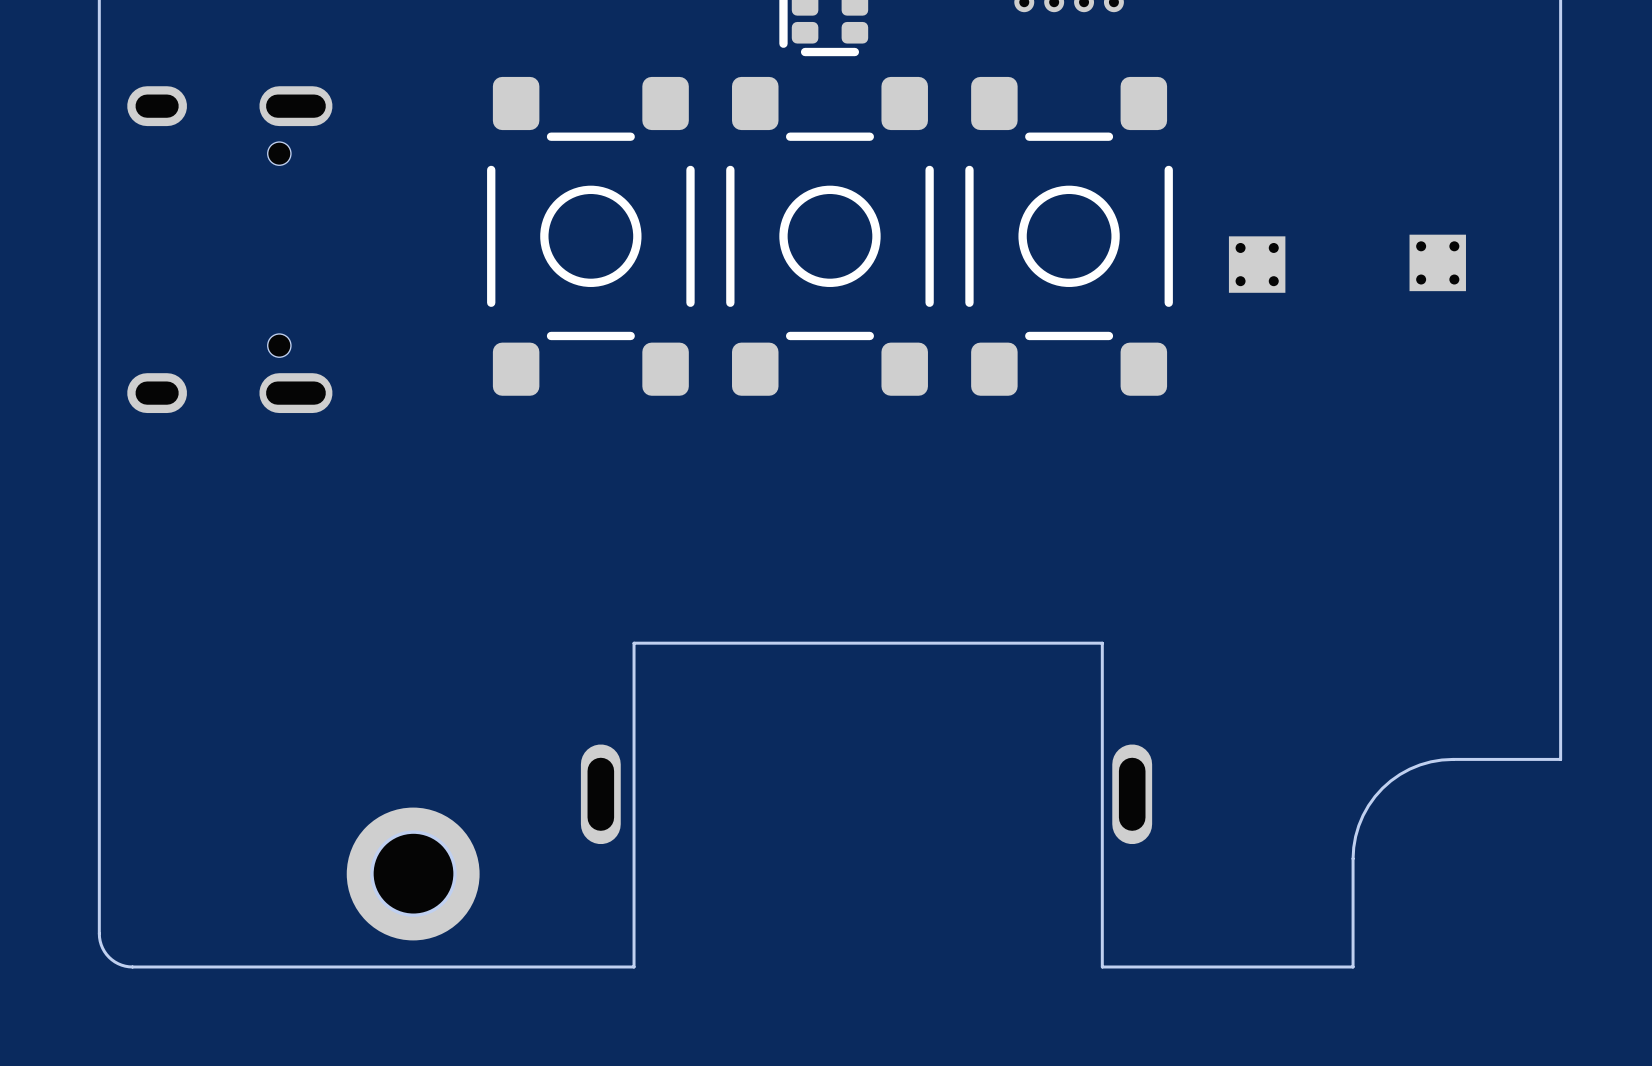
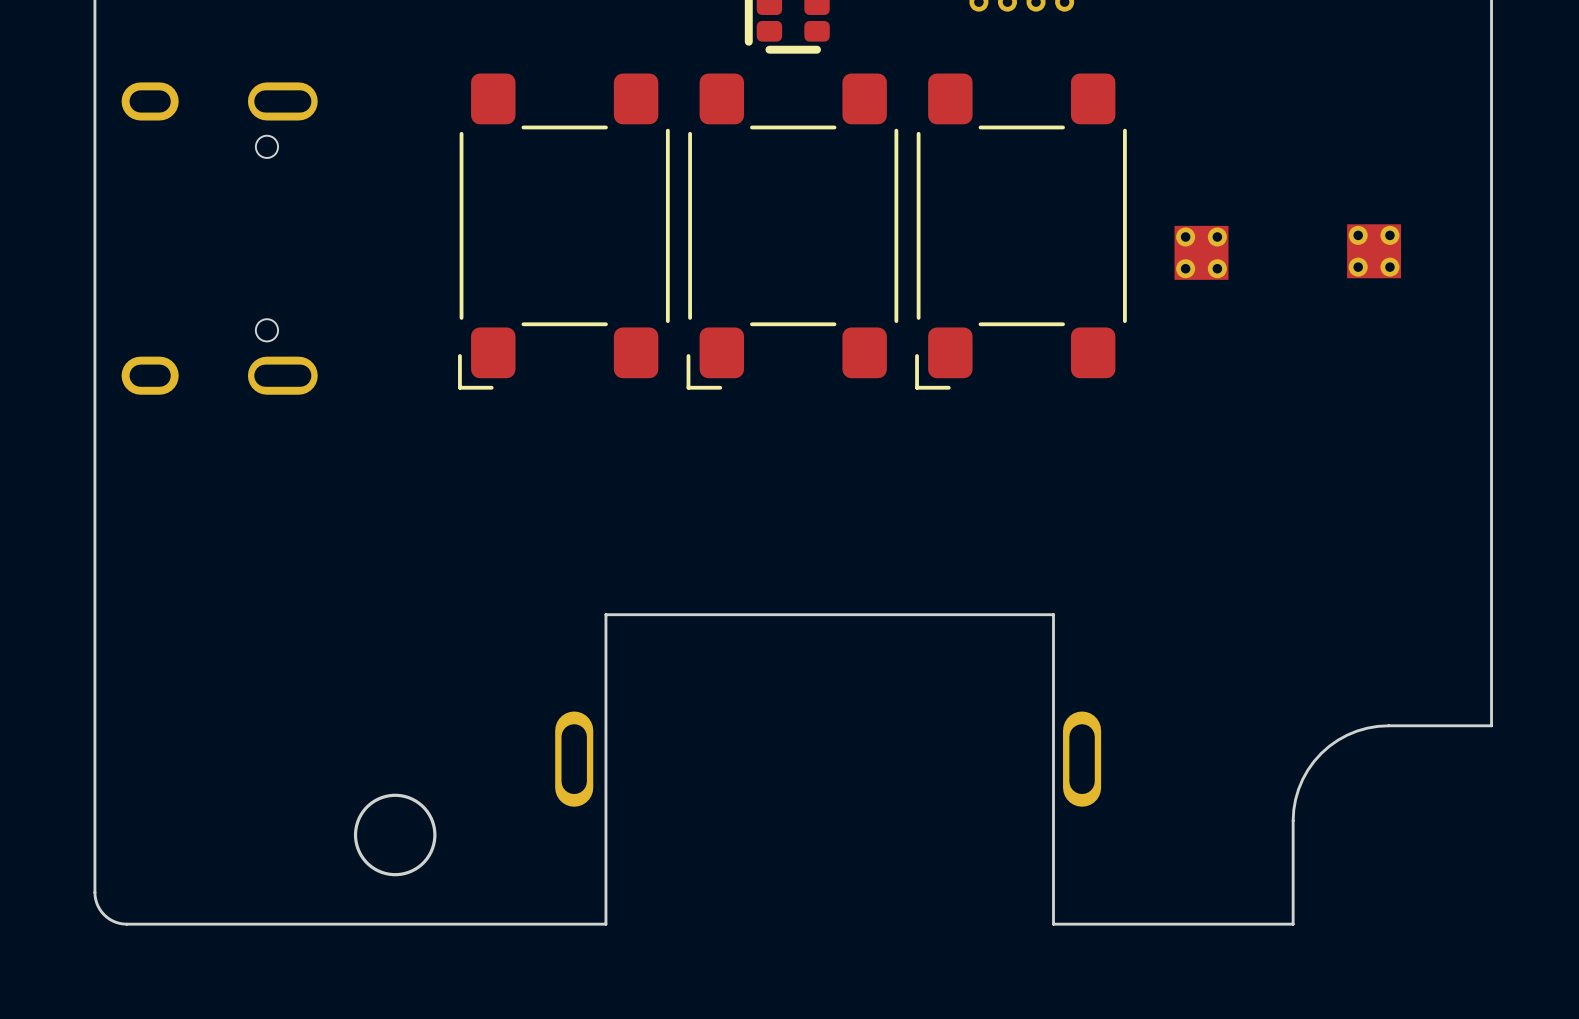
part footprint: [487, 76, 695, 396] -> [458, 73, 670, 390]
part footprint: [726, 76, 934, 396] -> [686, 73, 899, 390]
part footprint: [965, 76, 1173, 396] -> [915, 73, 1127, 390]
part: (413, 874) -> none

